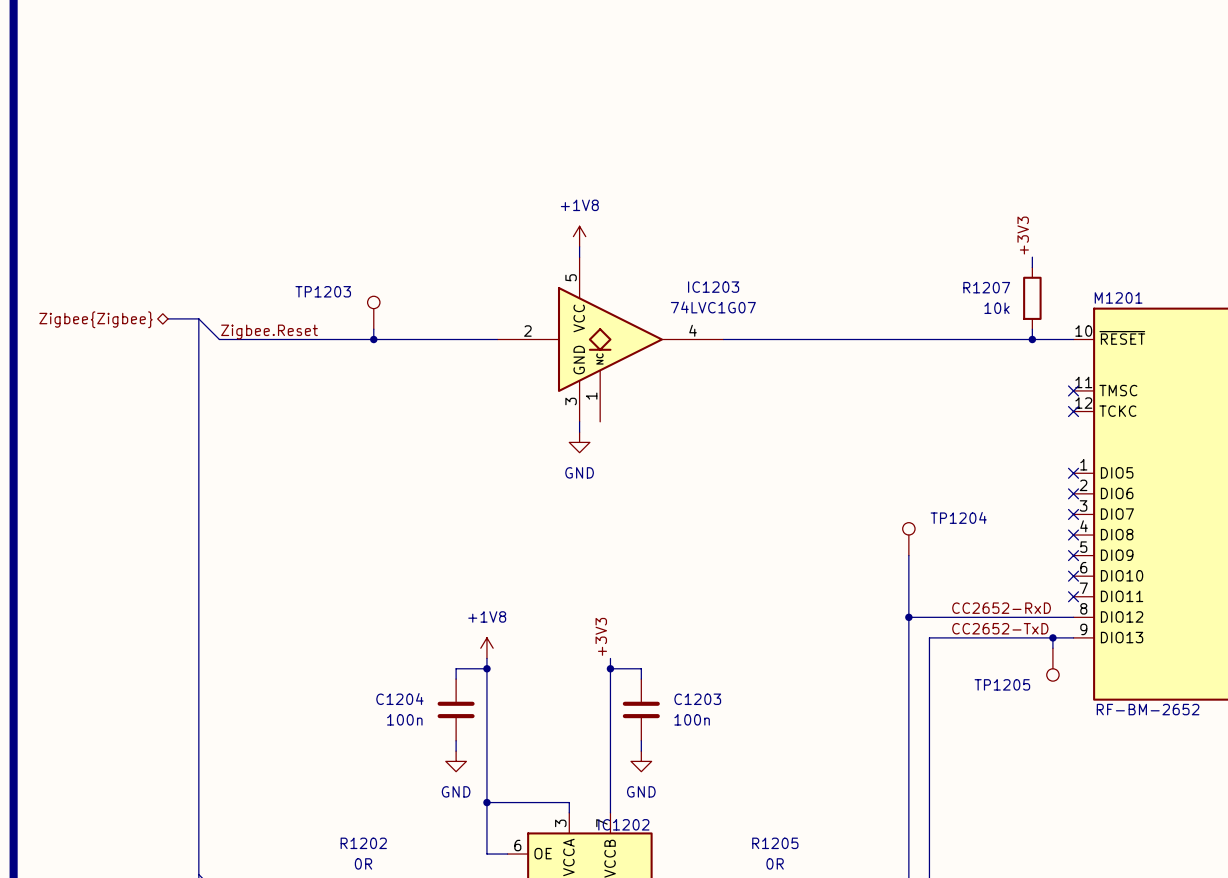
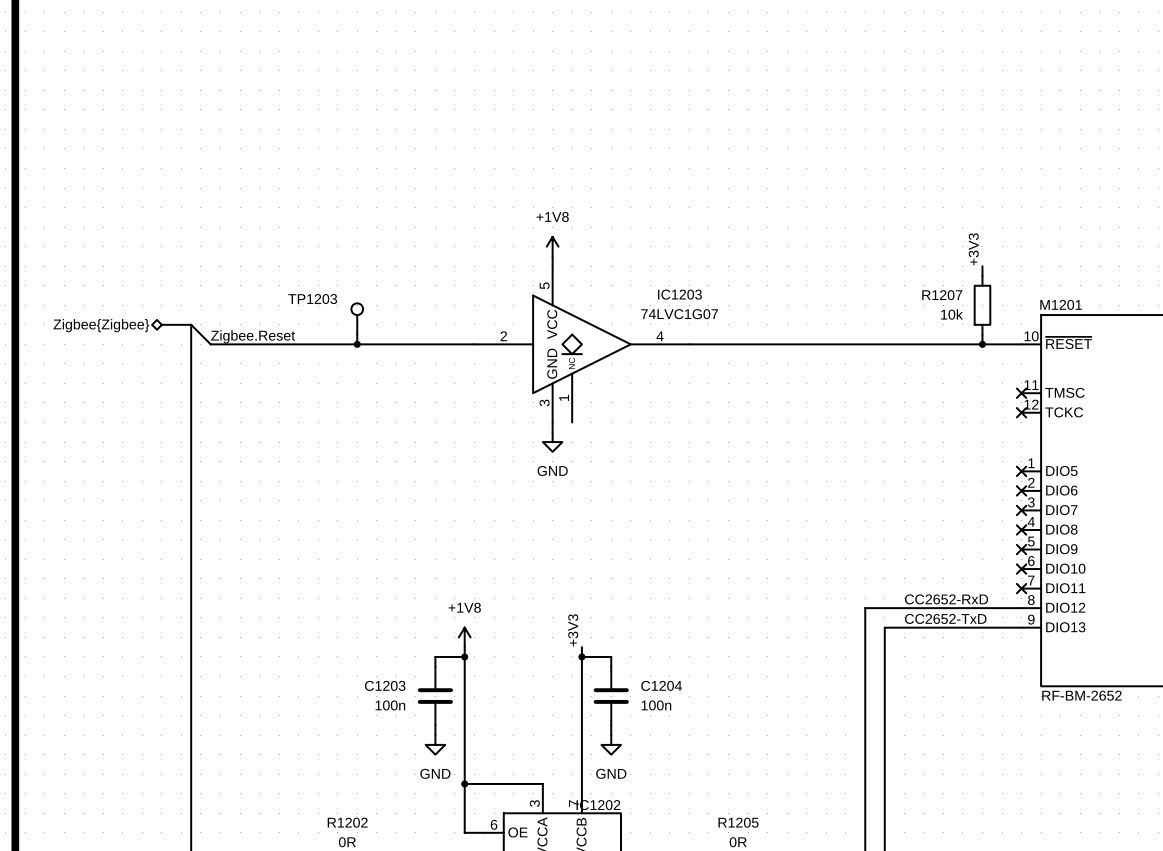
TP1204: (908, 539) -> none
wire: (908, 555) (908, 617) -> none
junction: (908, 617) -> none
wire: (1052, 637) (1052, 648) -> none
junction: (1052, 637) -> none
TP1205: (1052, 664) -> none
C1204 name: C1204 (399, 699) -> C1203 (385, 685)
C1203 name: C1203 (697, 699) -> C1204 (661, 685)

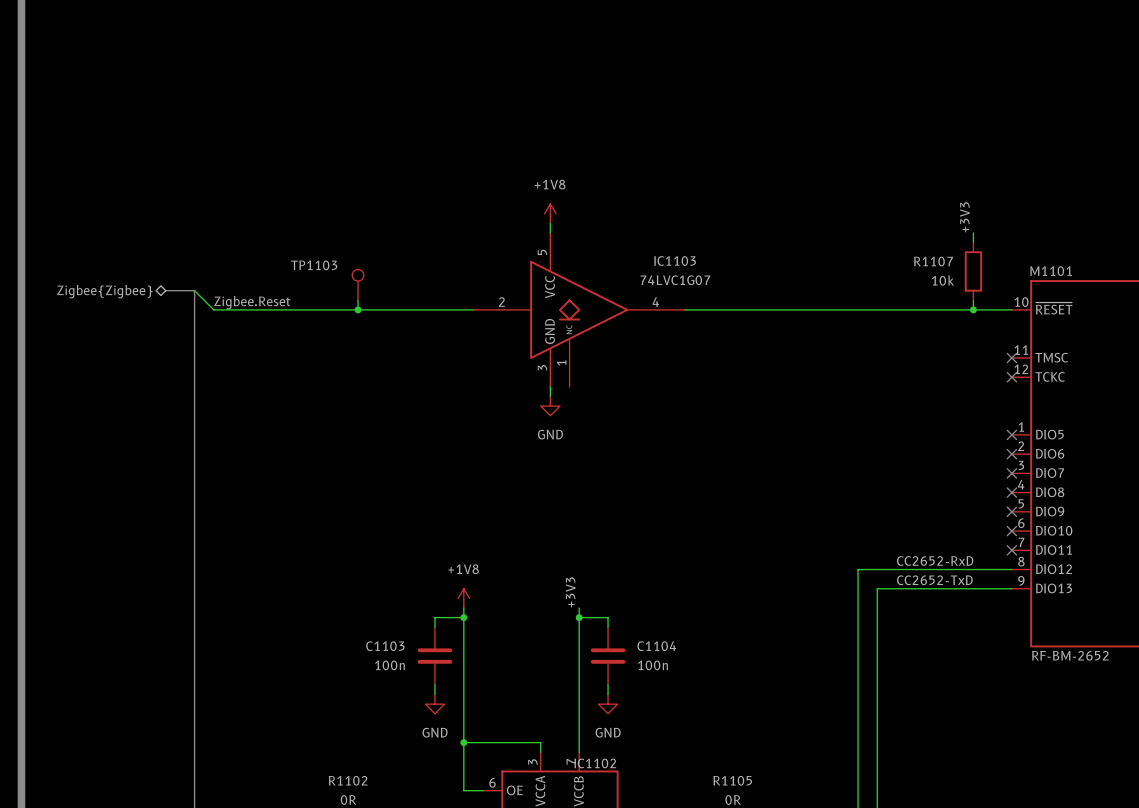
IC1203 name: IC1203 (679, 294) -> IC1103 (675, 260)
R1207 name: R1207 (942, 295) -> R1107 (933, 261)
TP1203 name: TP1203 (312, 299) -> TP1103 (314, 265)
M1201 name: M1201 (1061, 304) -> M1101 (1051, 271)
C1203 name: C1203 (385, 685) -> C1103 (385, 646)
C1204 name: C1204 (661, 685) -> C1104 (656, 646)
IC1202 name: IC1202 (598, 805) -> IC1102 (595, 763)
R1202 name: R1202 (347, 822) -> R1102 (348, 780)
R1205 name: R1205 (738, 822) -> R1105 (732, 780)

